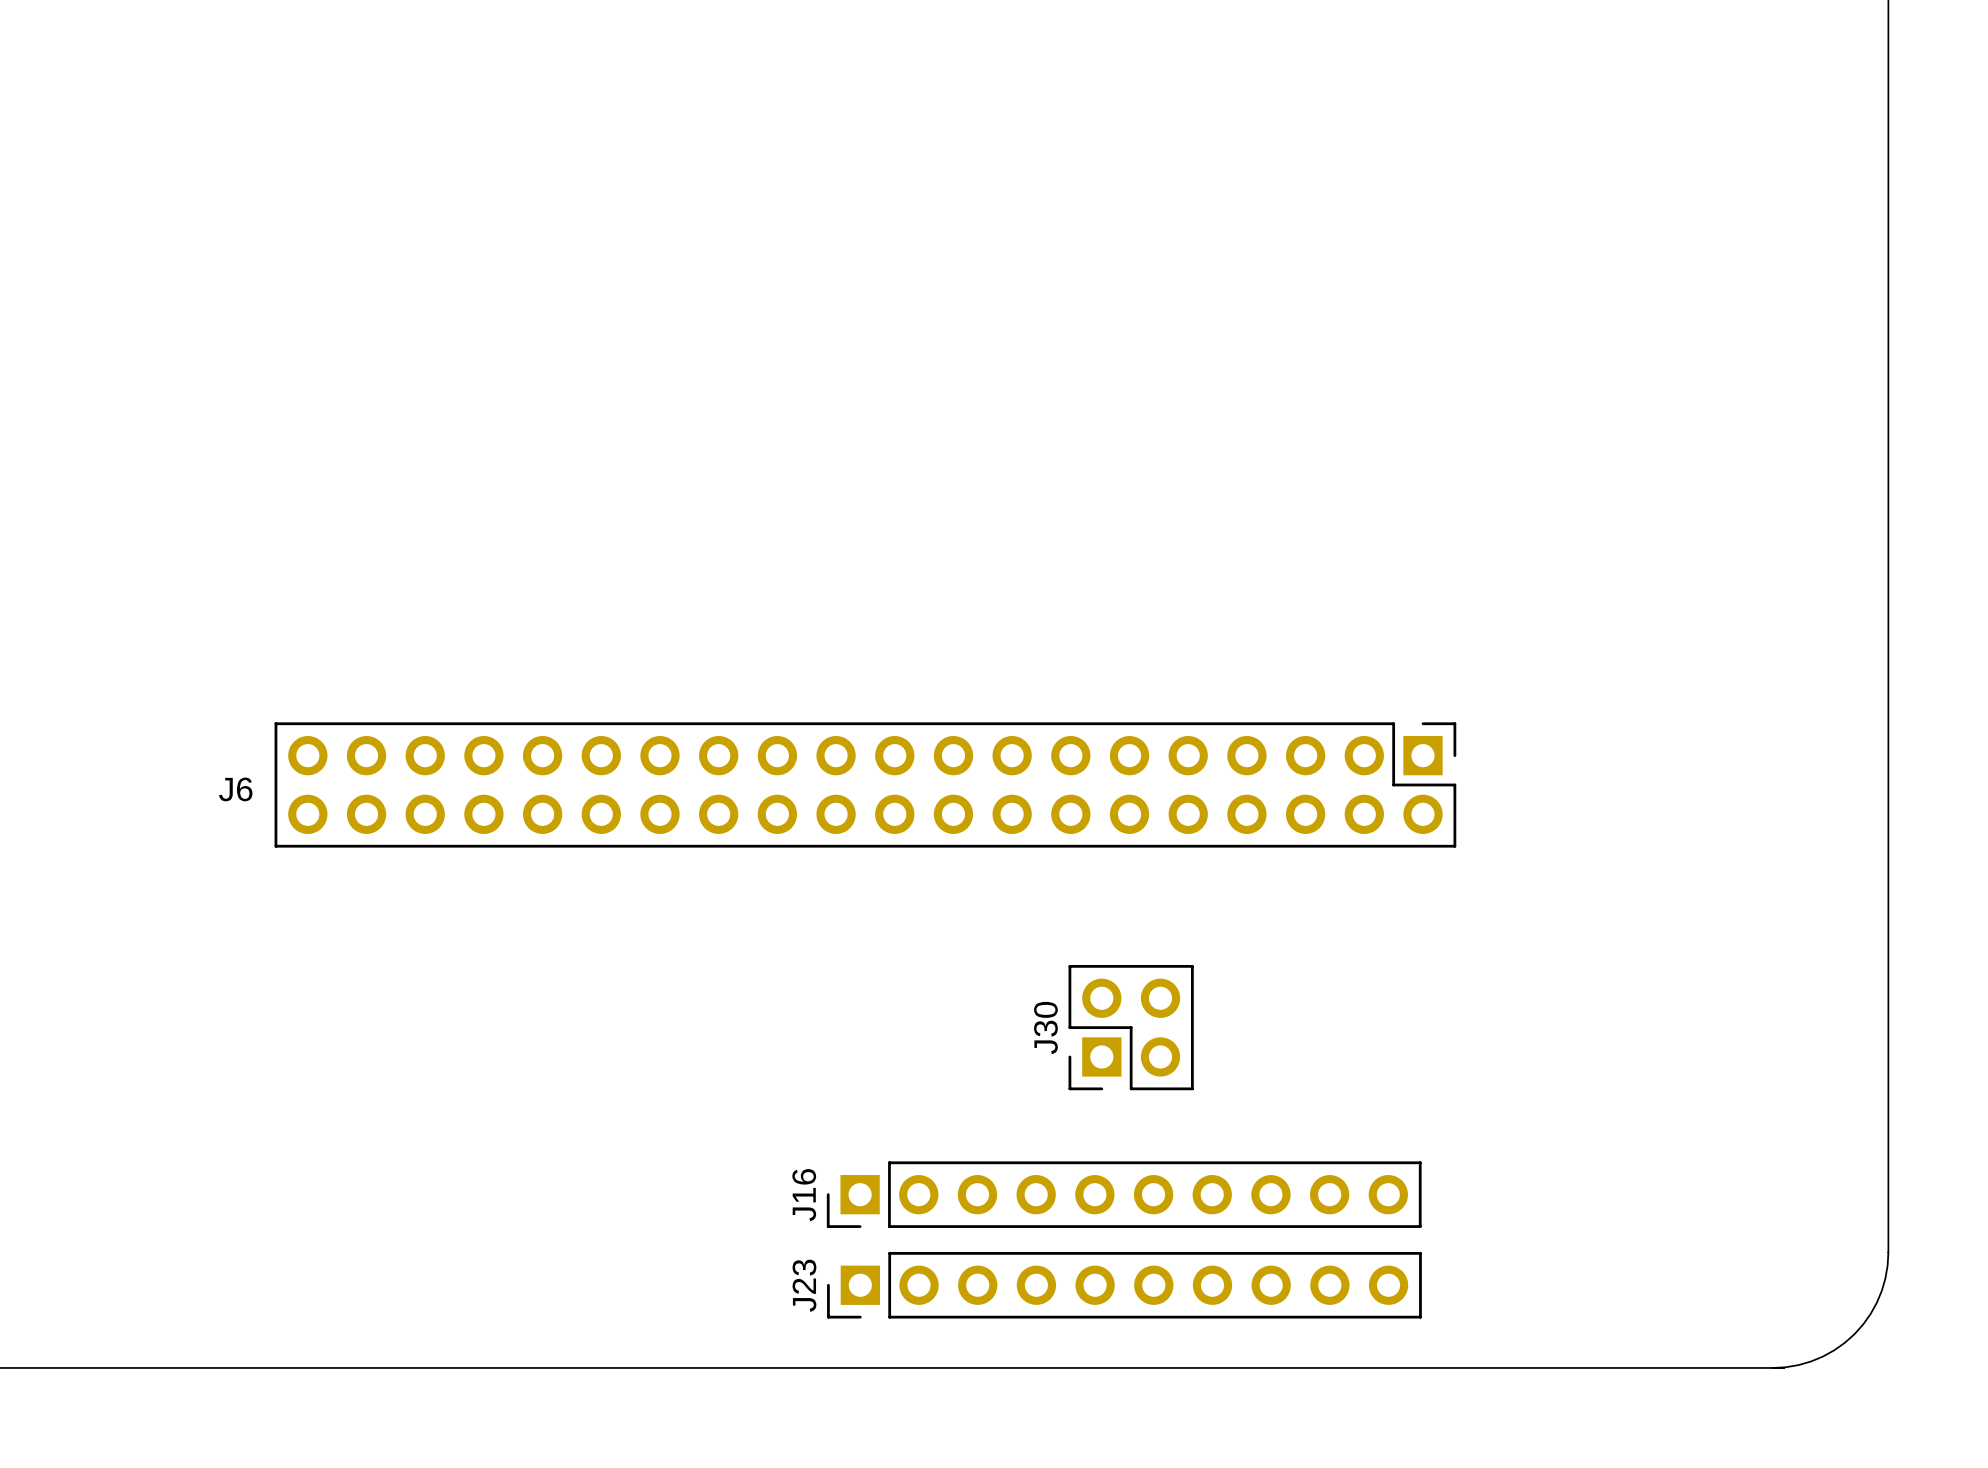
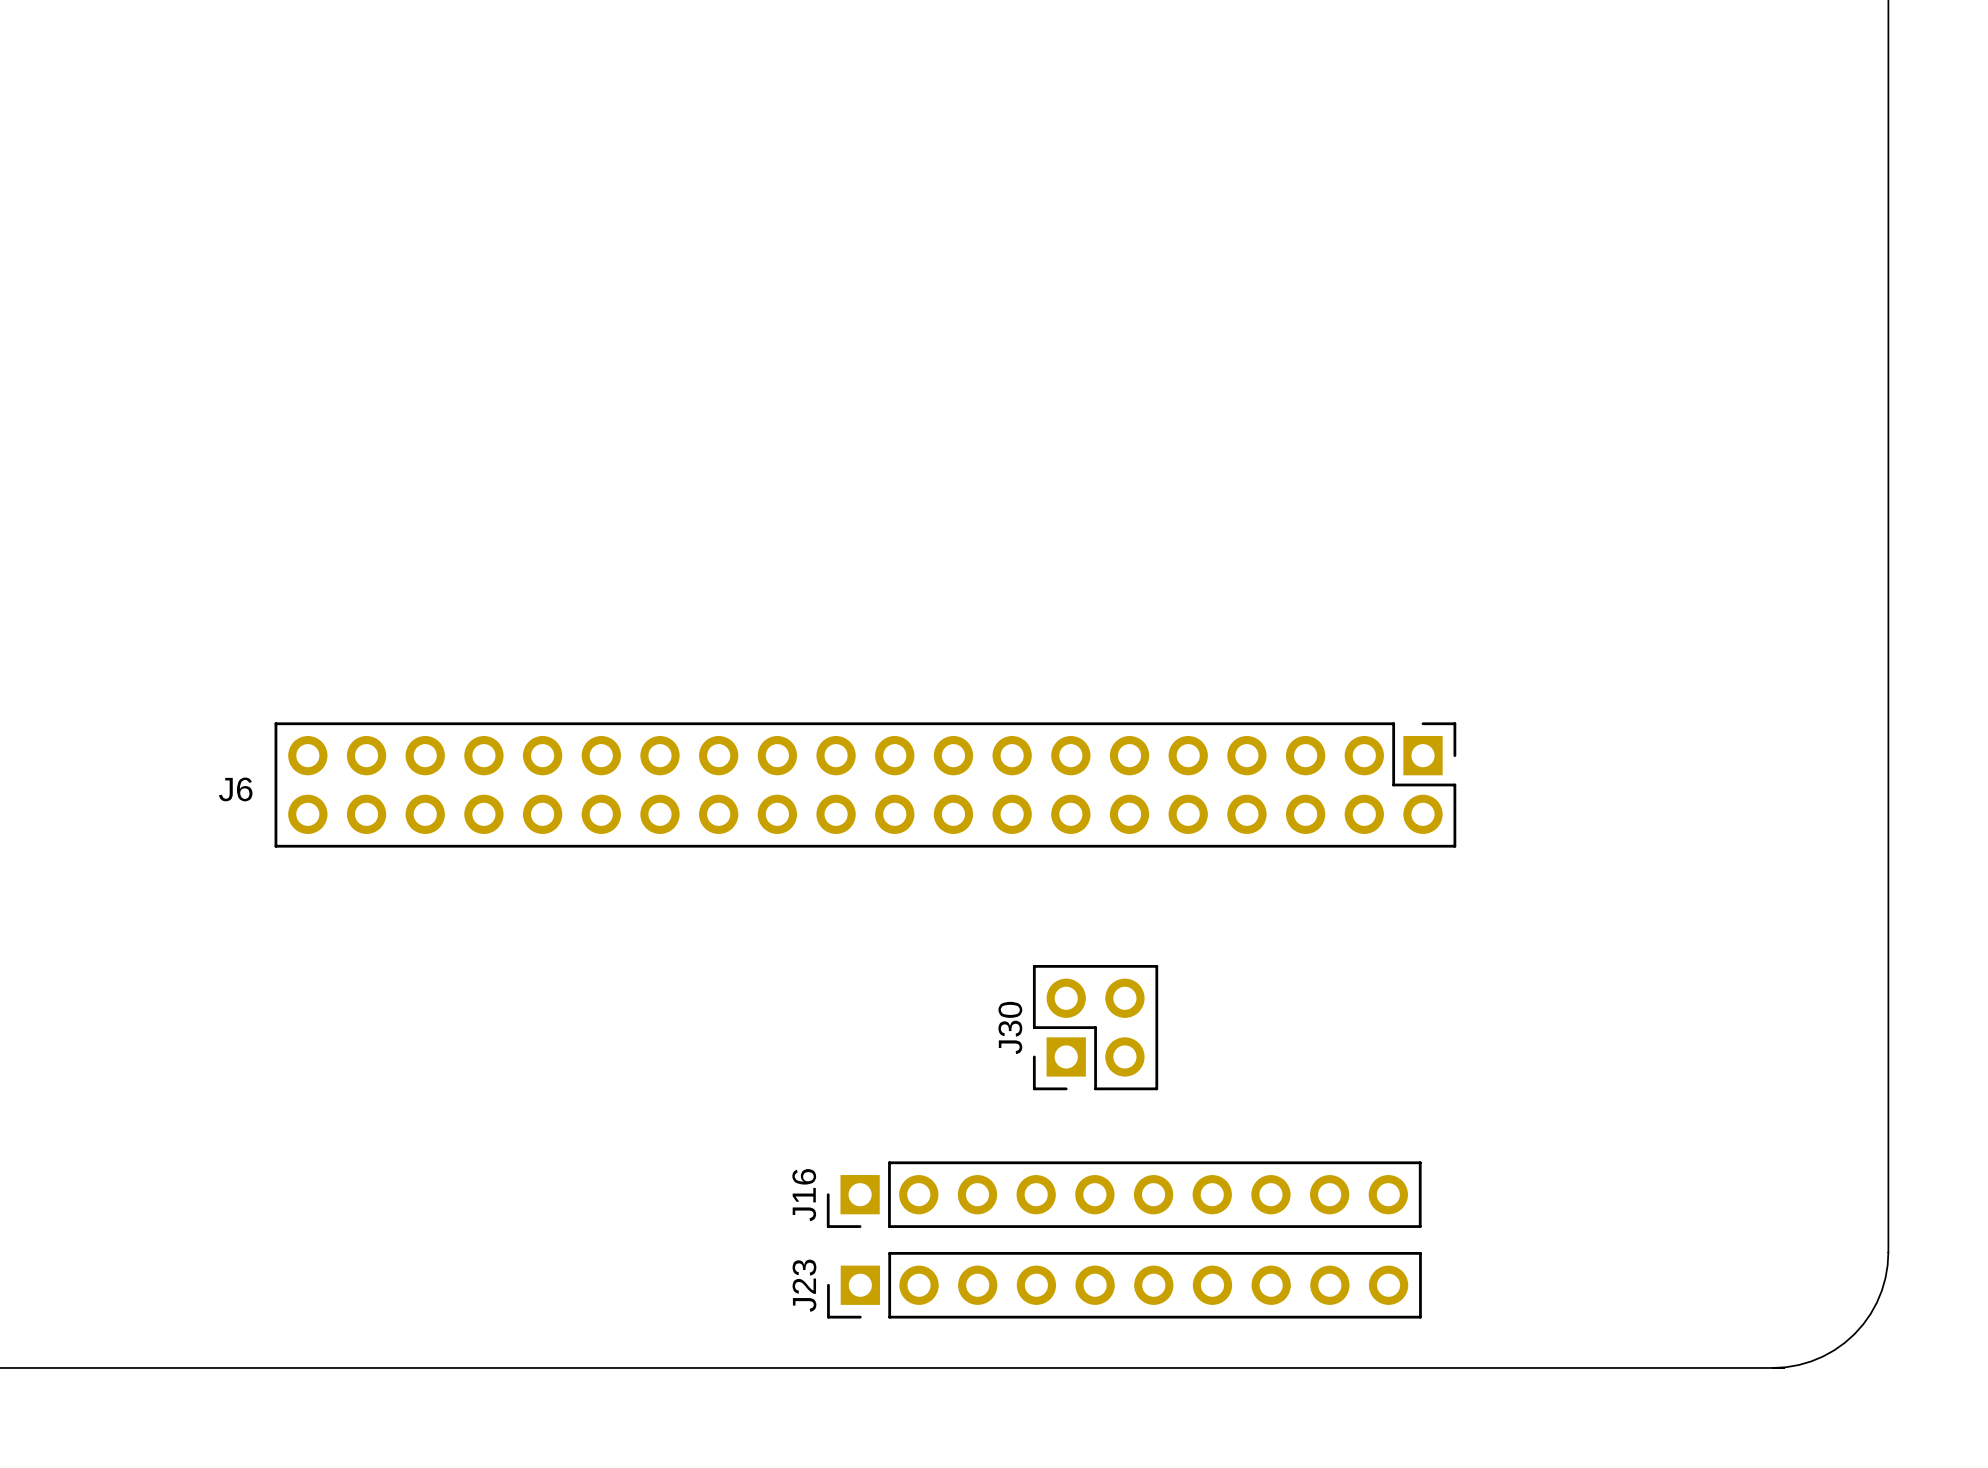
J30 position: (1131, 1027) -> (1095, 1027)

